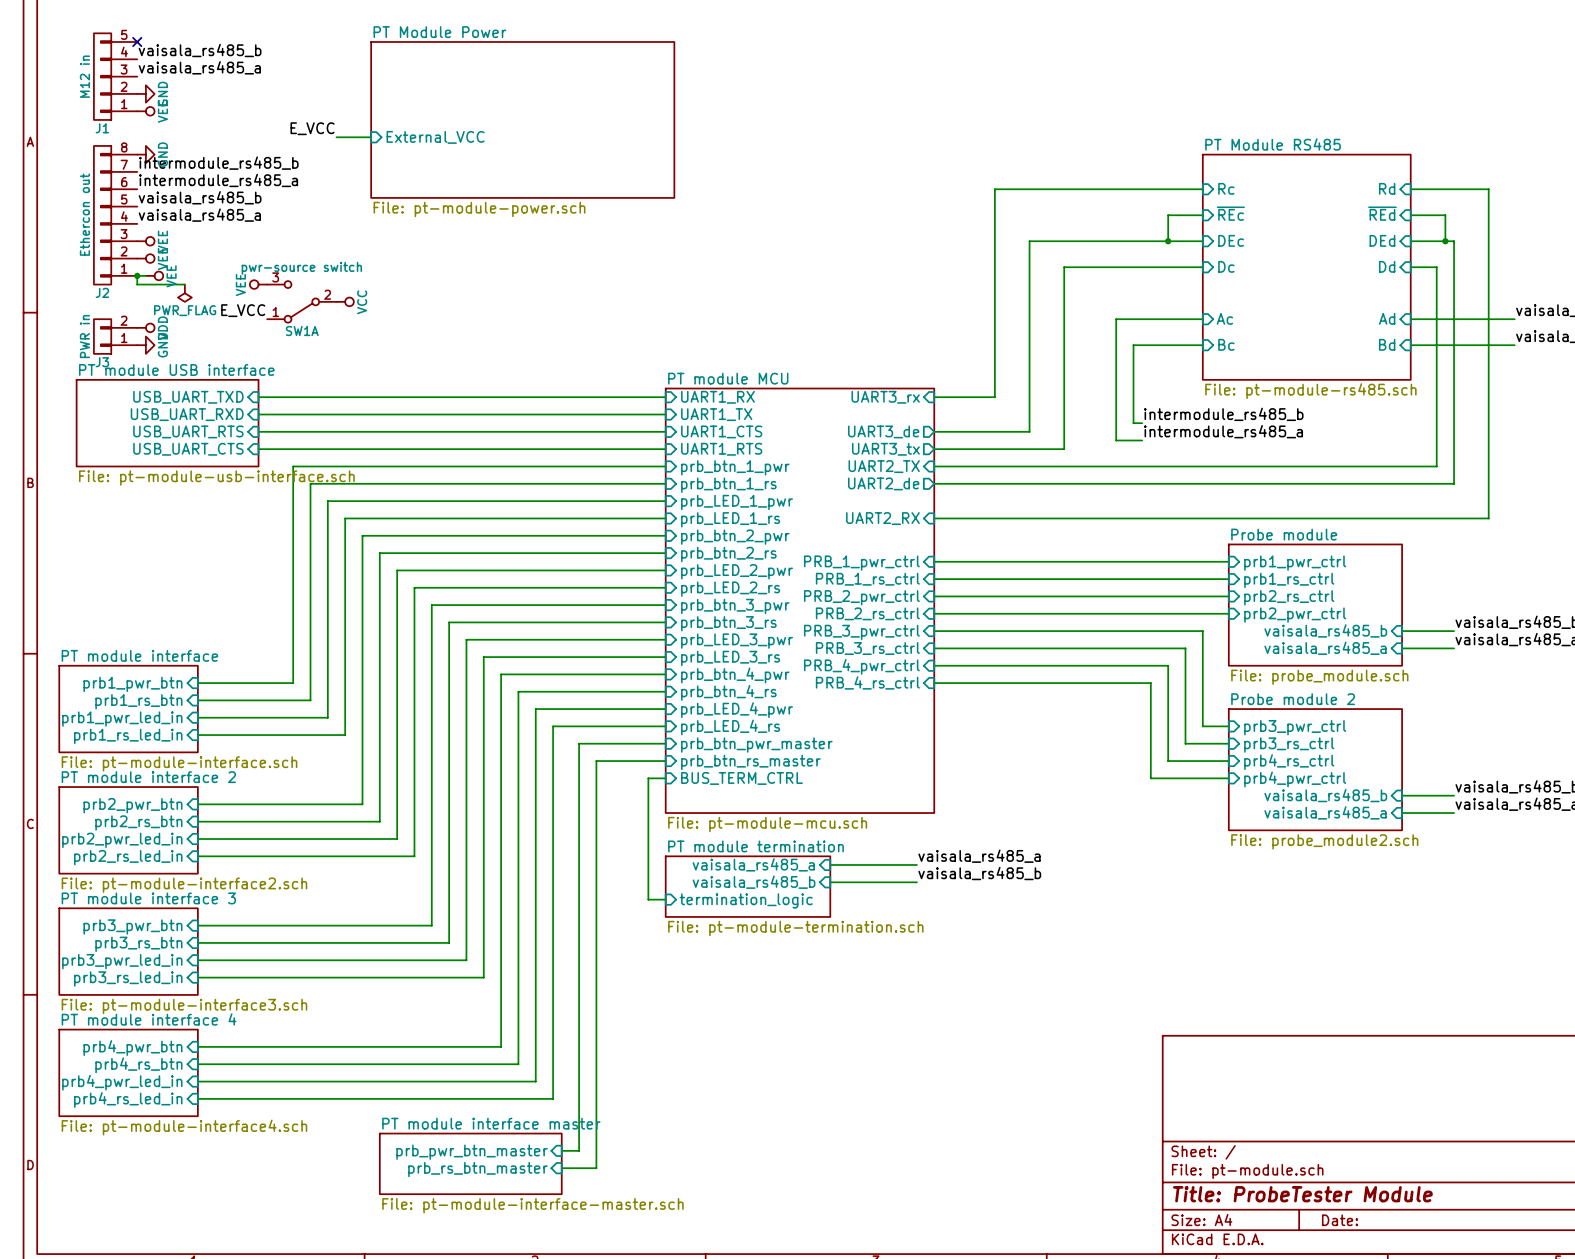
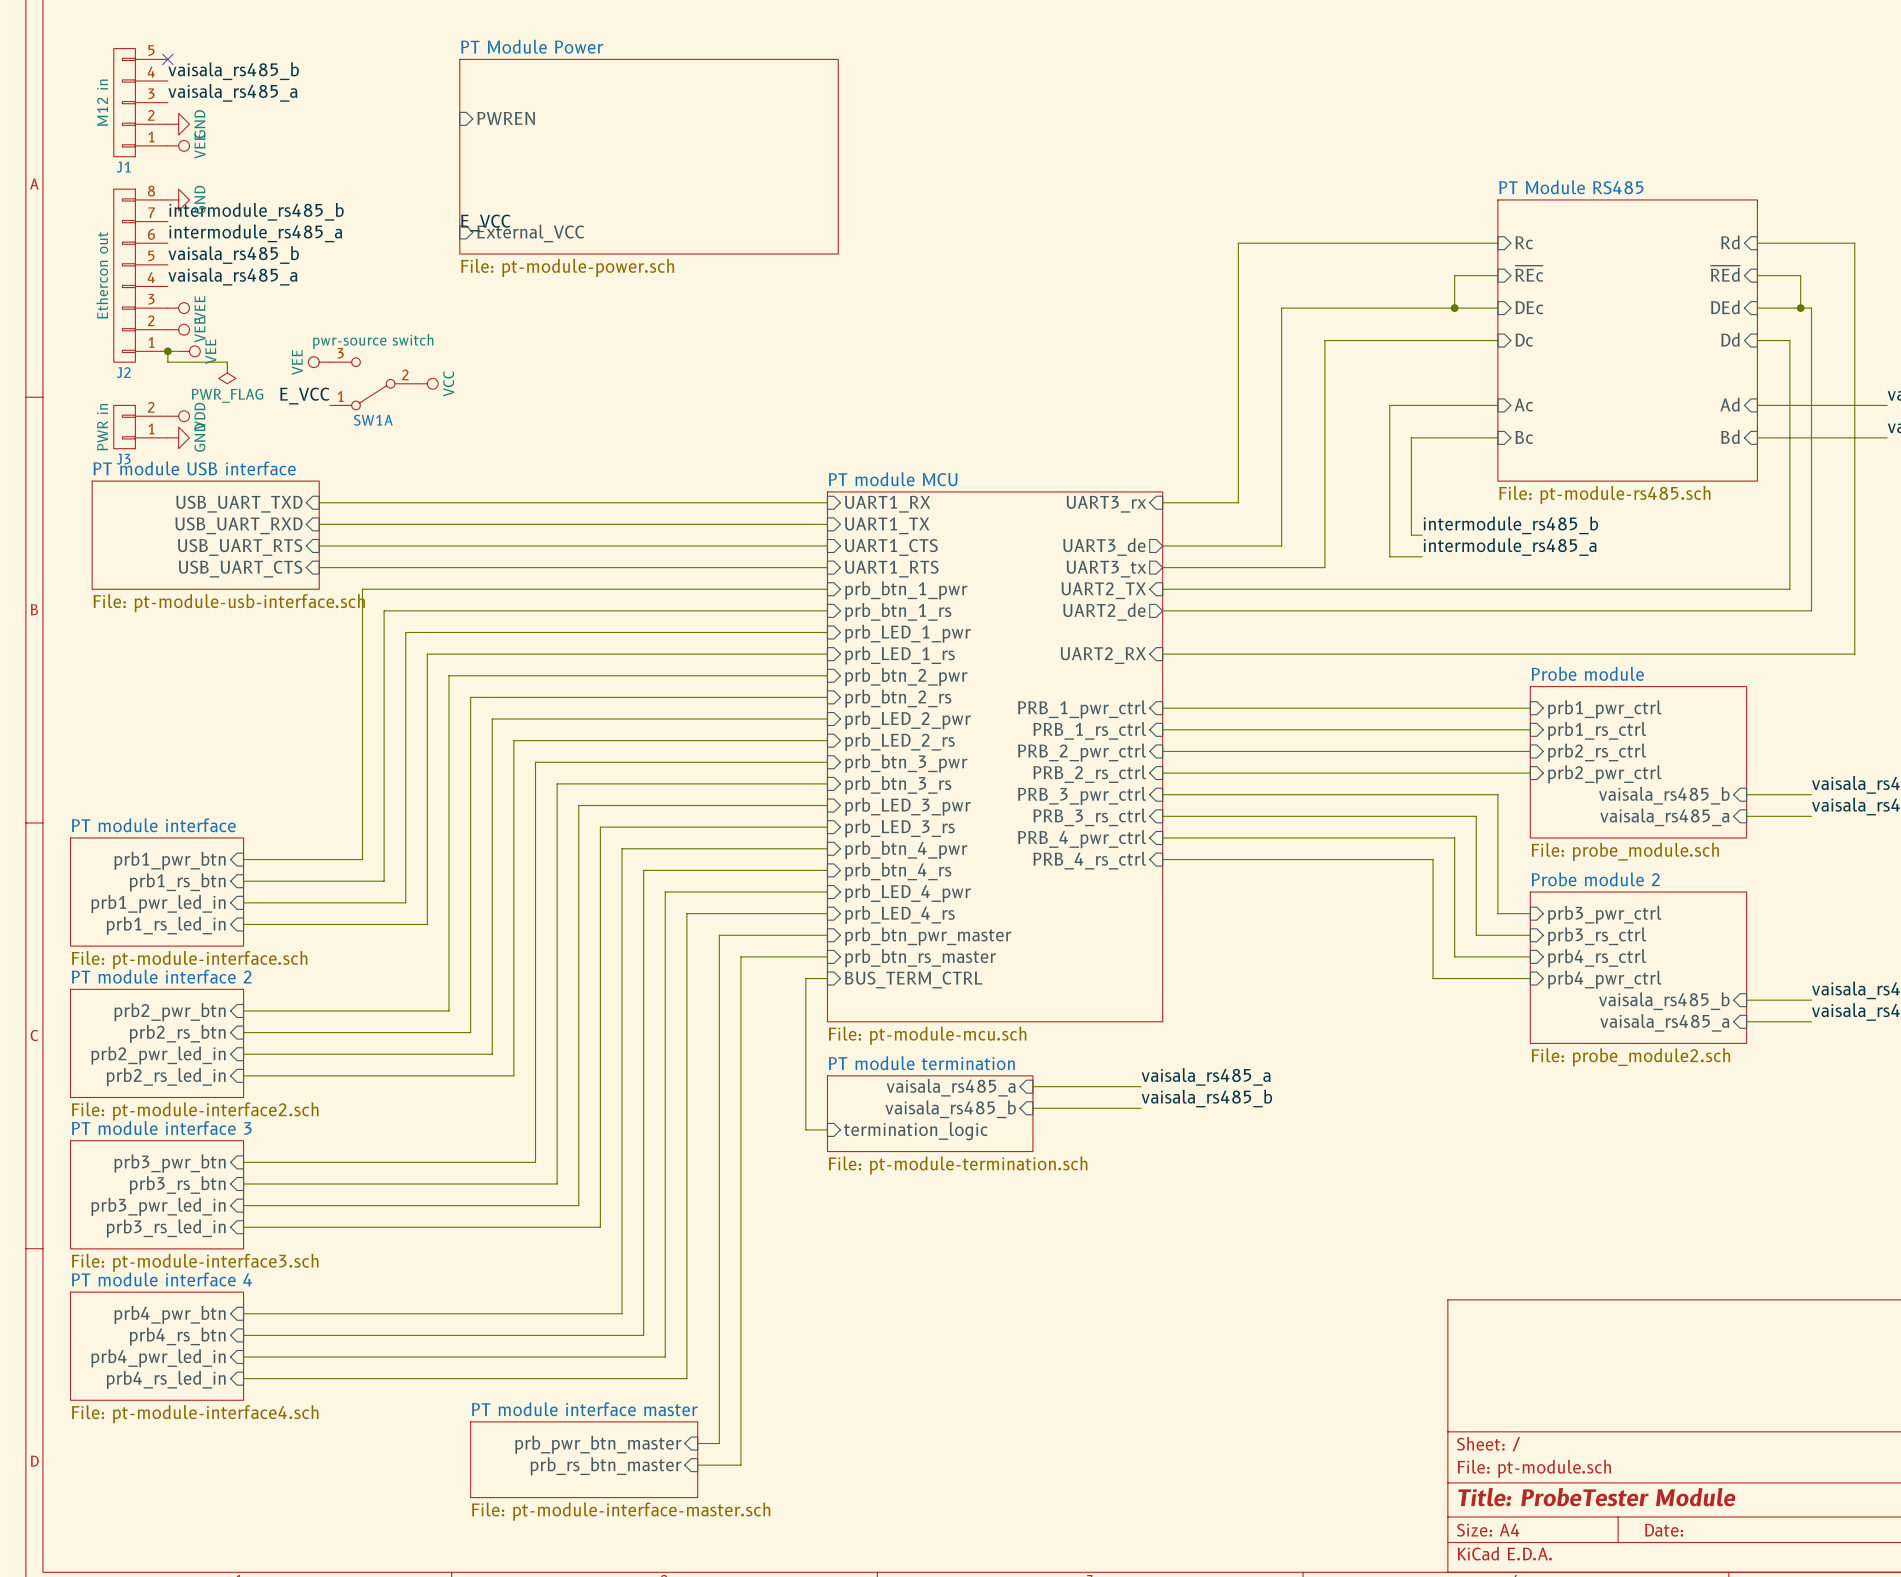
sheet pin: none -> PWREN (506, 118)
label position: E_VCC (312, 128) -> E_VCC (485, 223)
wire: (336, 137) (371, 137) -> none
sheet pin position: External_VCC (435, 137) -> External_VCC (530, 233)

